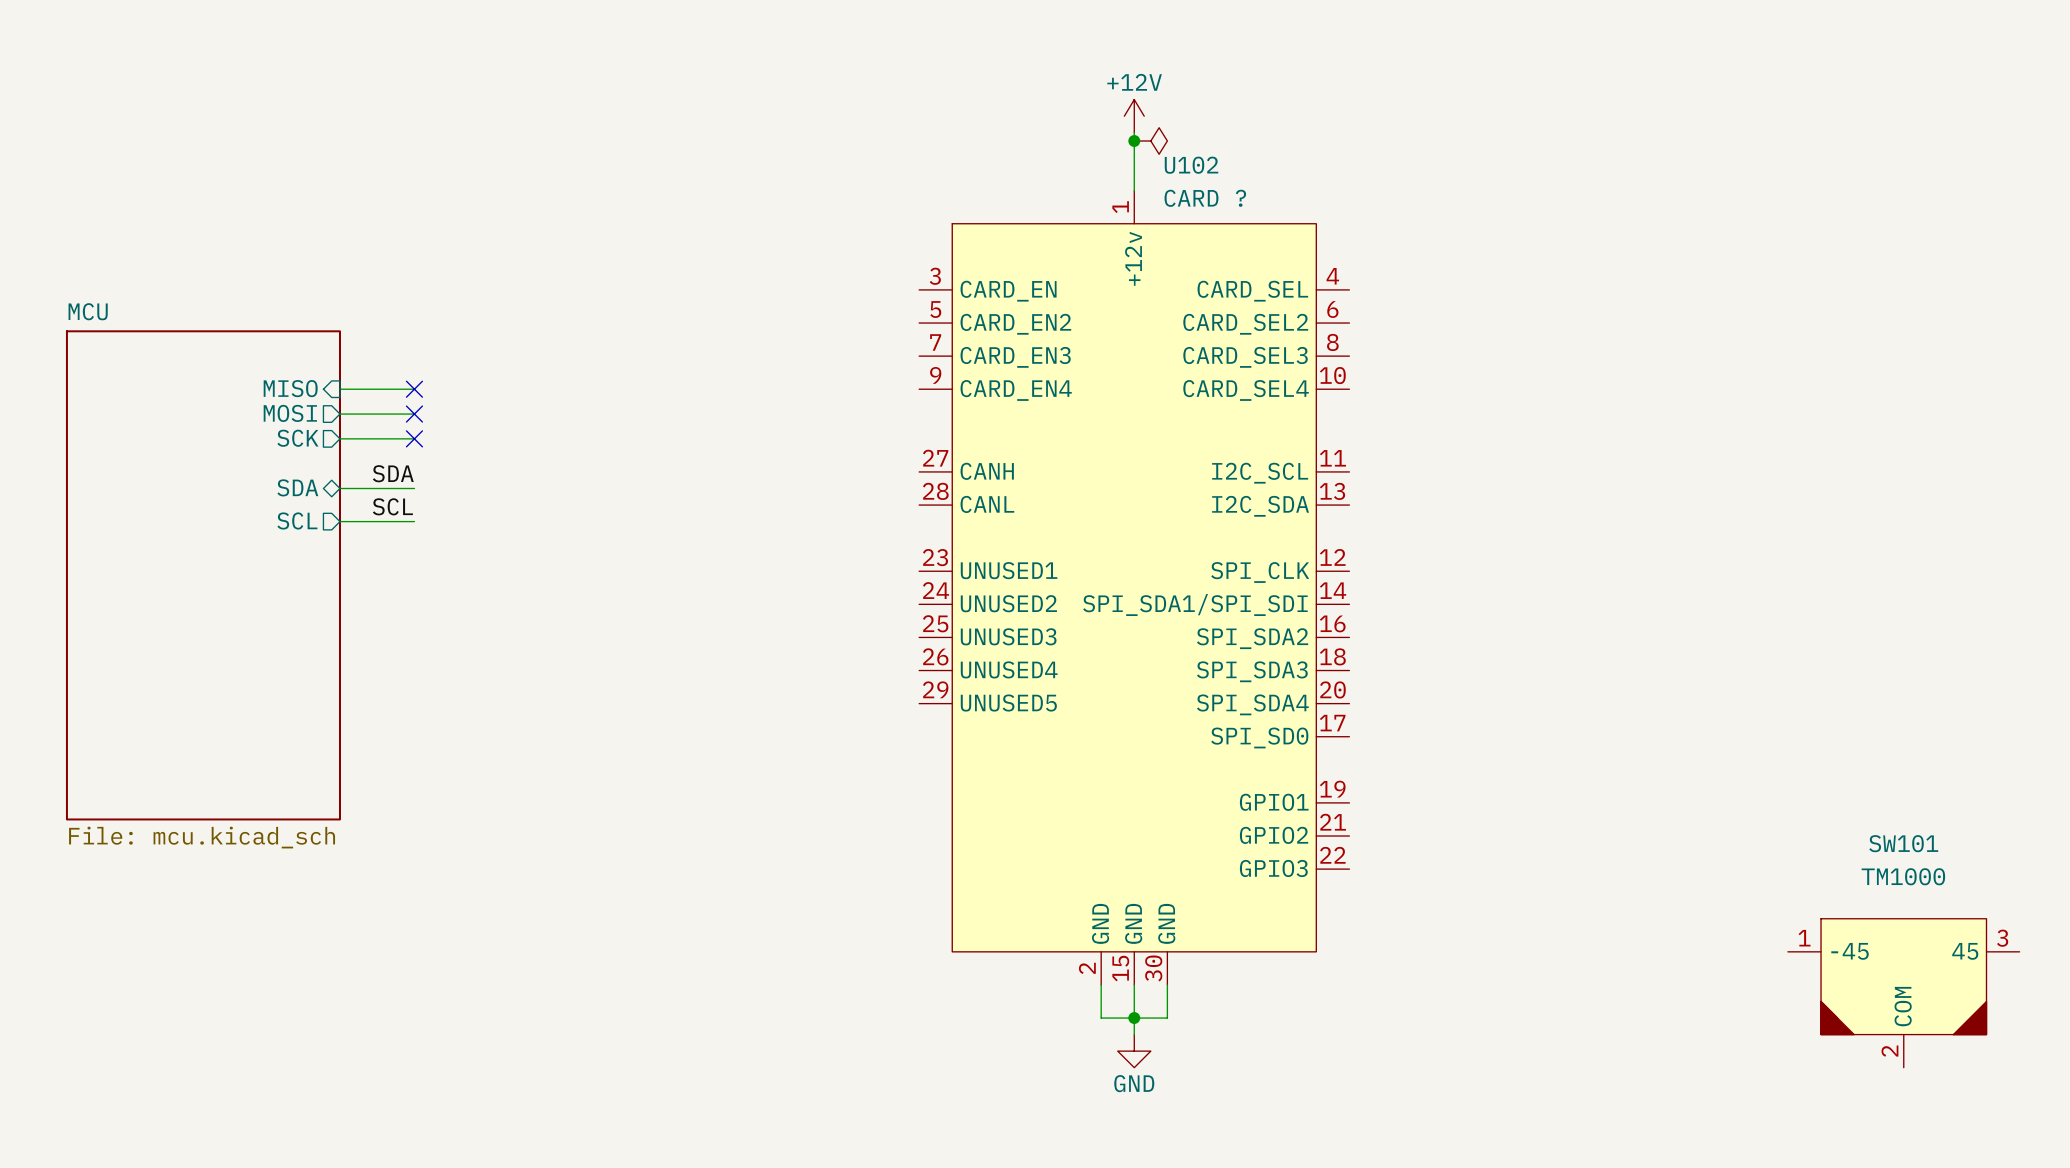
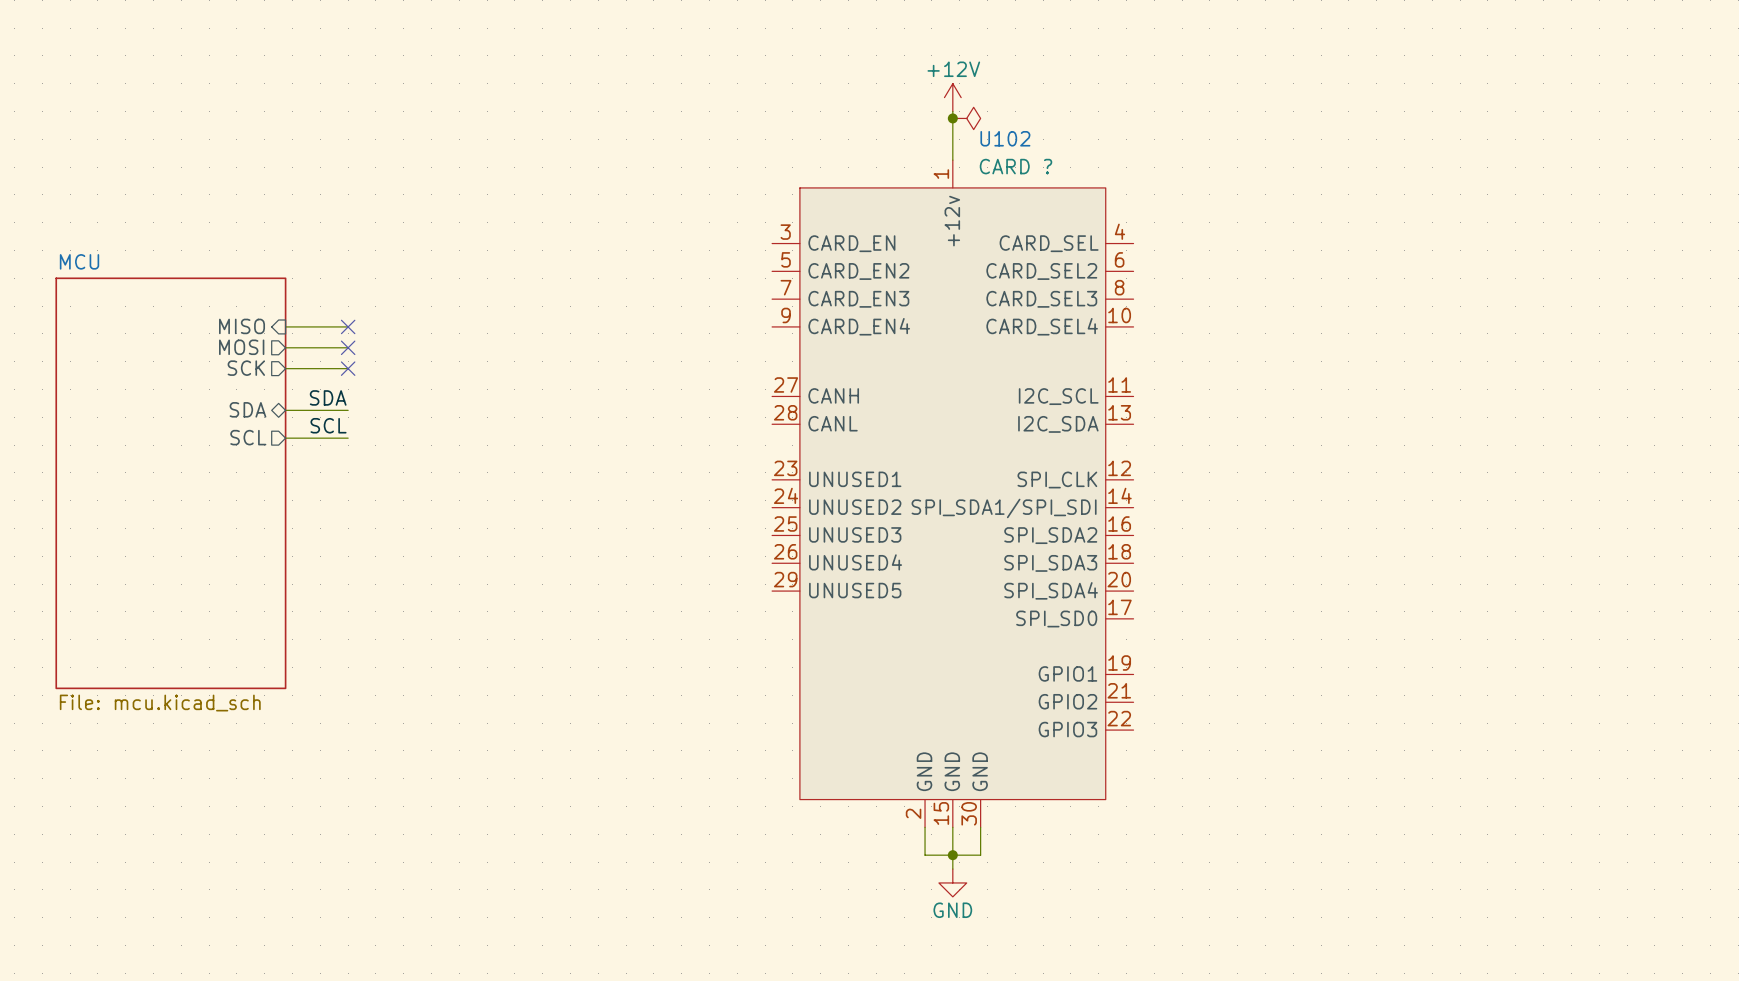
SW101: TM1000 (1903, 993) -> none

